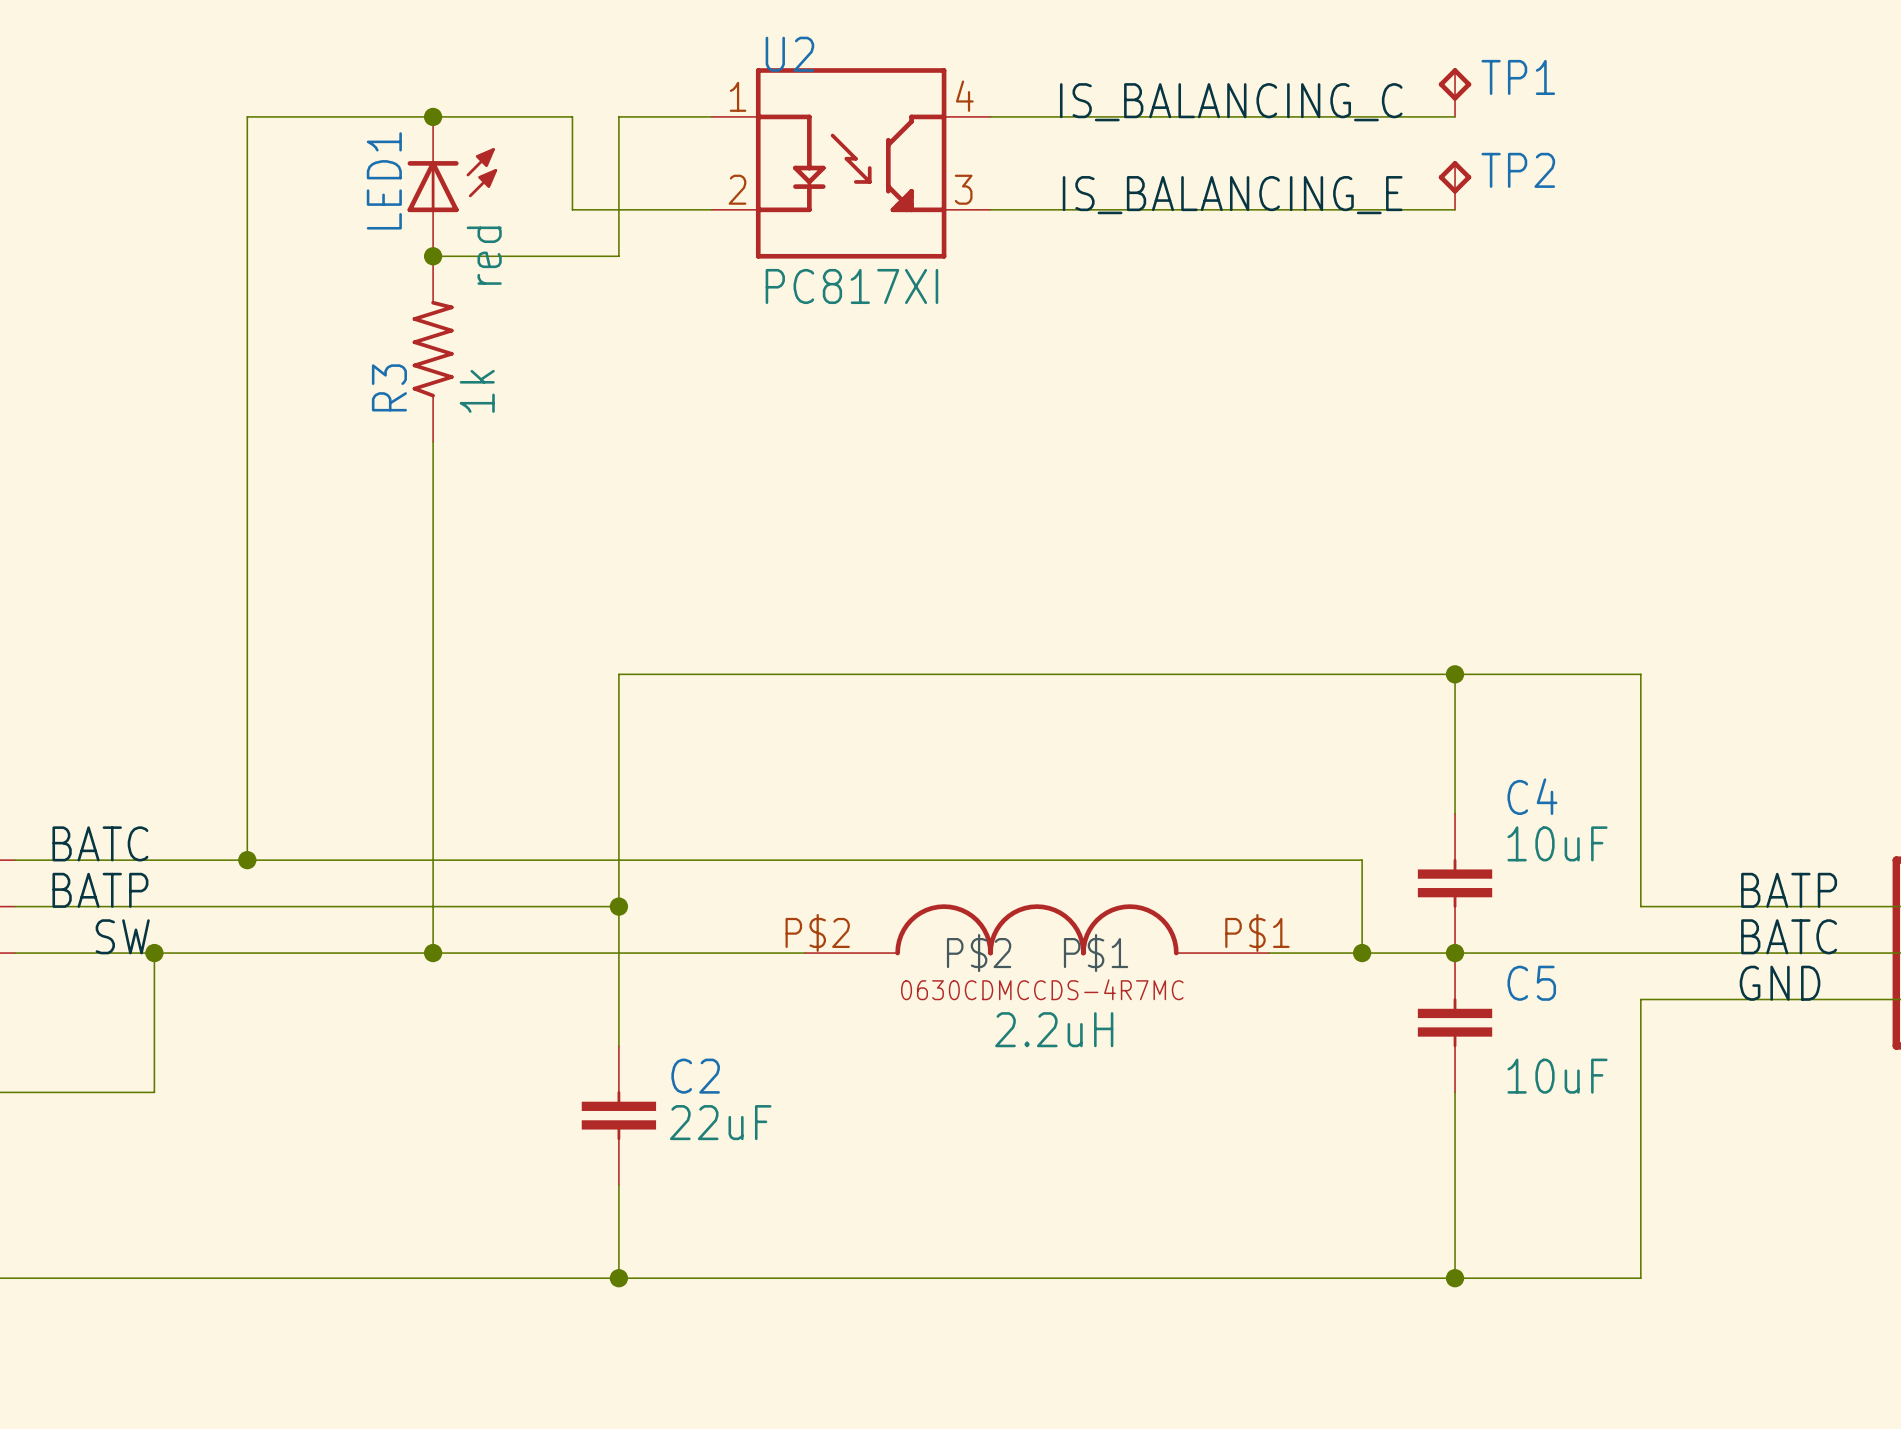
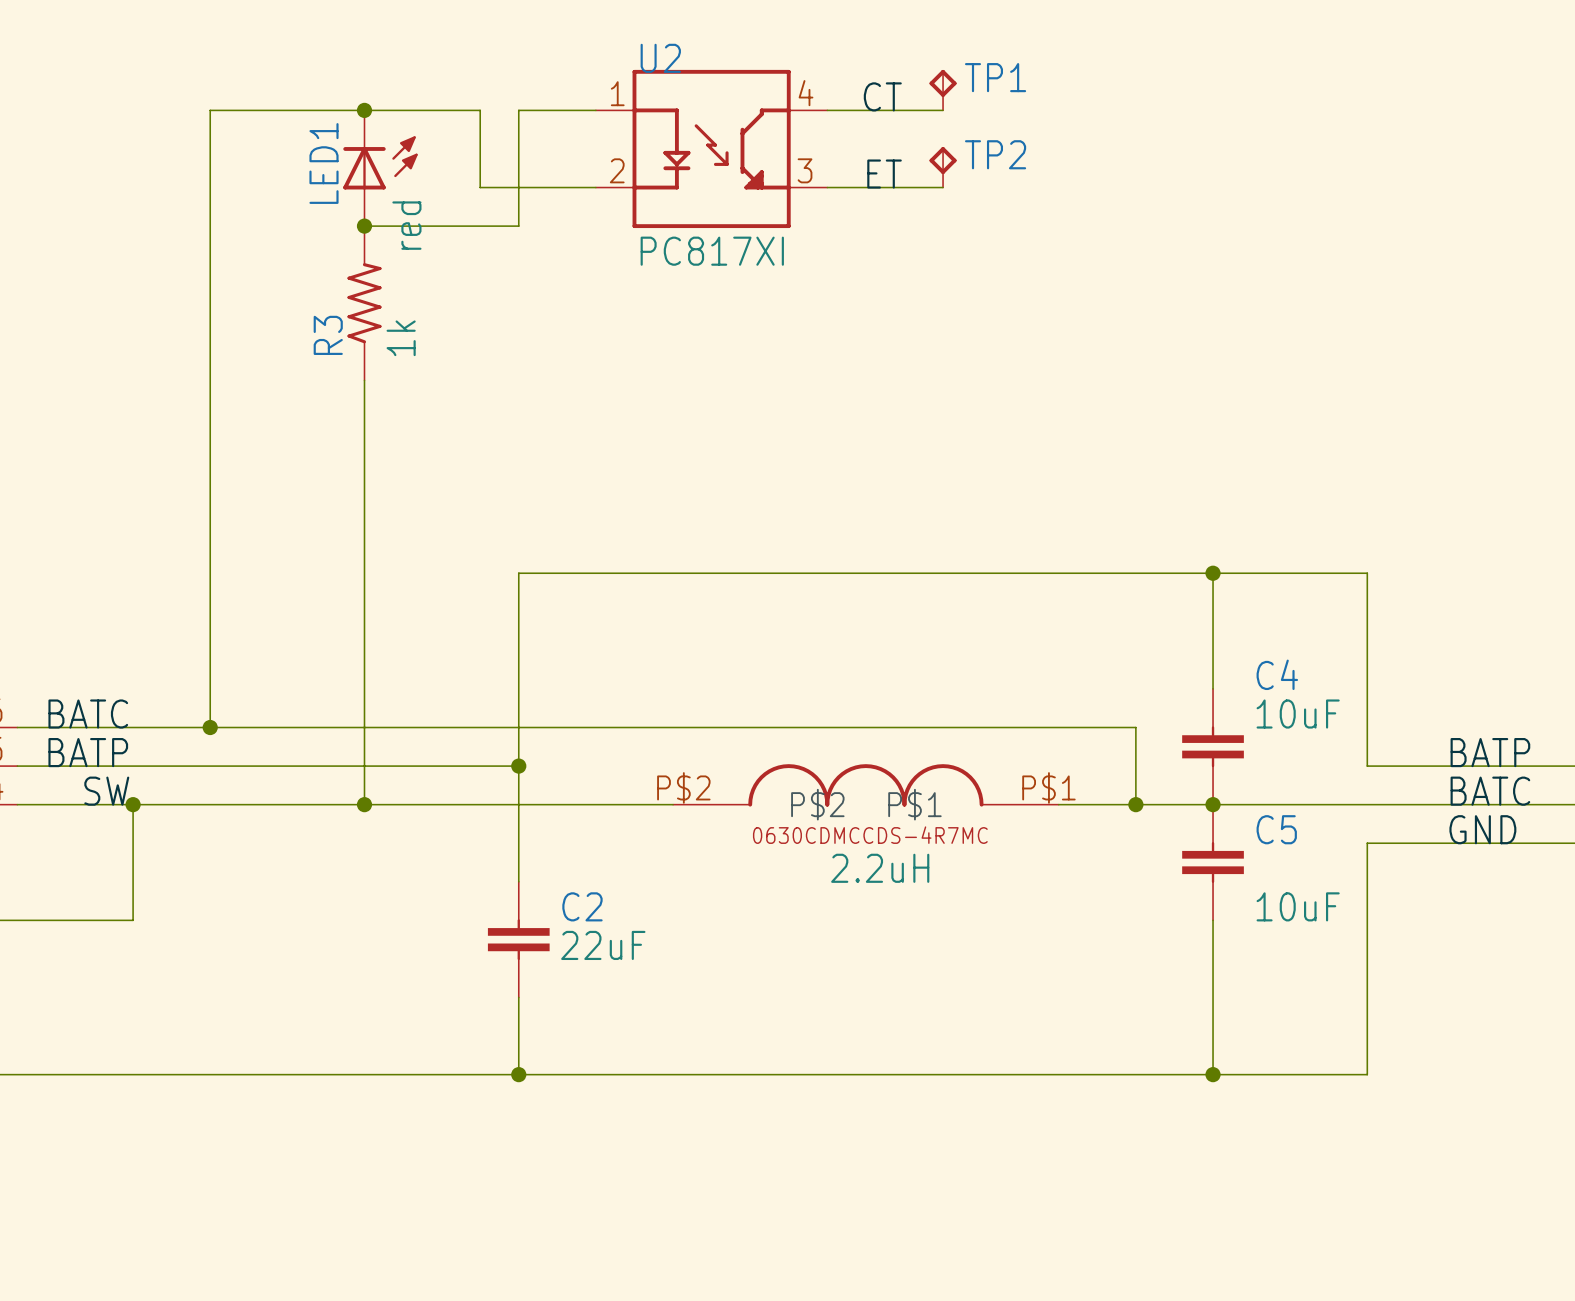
TP1 position: (1455, 92) -> (943, 90)
label: none -> CT (882, 96)
label: IS_BALANCING_C (1231, 102) -> none
wire: (1129, 116) (1455, 116) -> none
TP2 position: (1455, 185) -> (943, 167)
label: none -> ET (884, 174)
label: IS_BALANCING_E (1232, 195) -> none
wire: (1129, 209) (1455, 209) -> none

